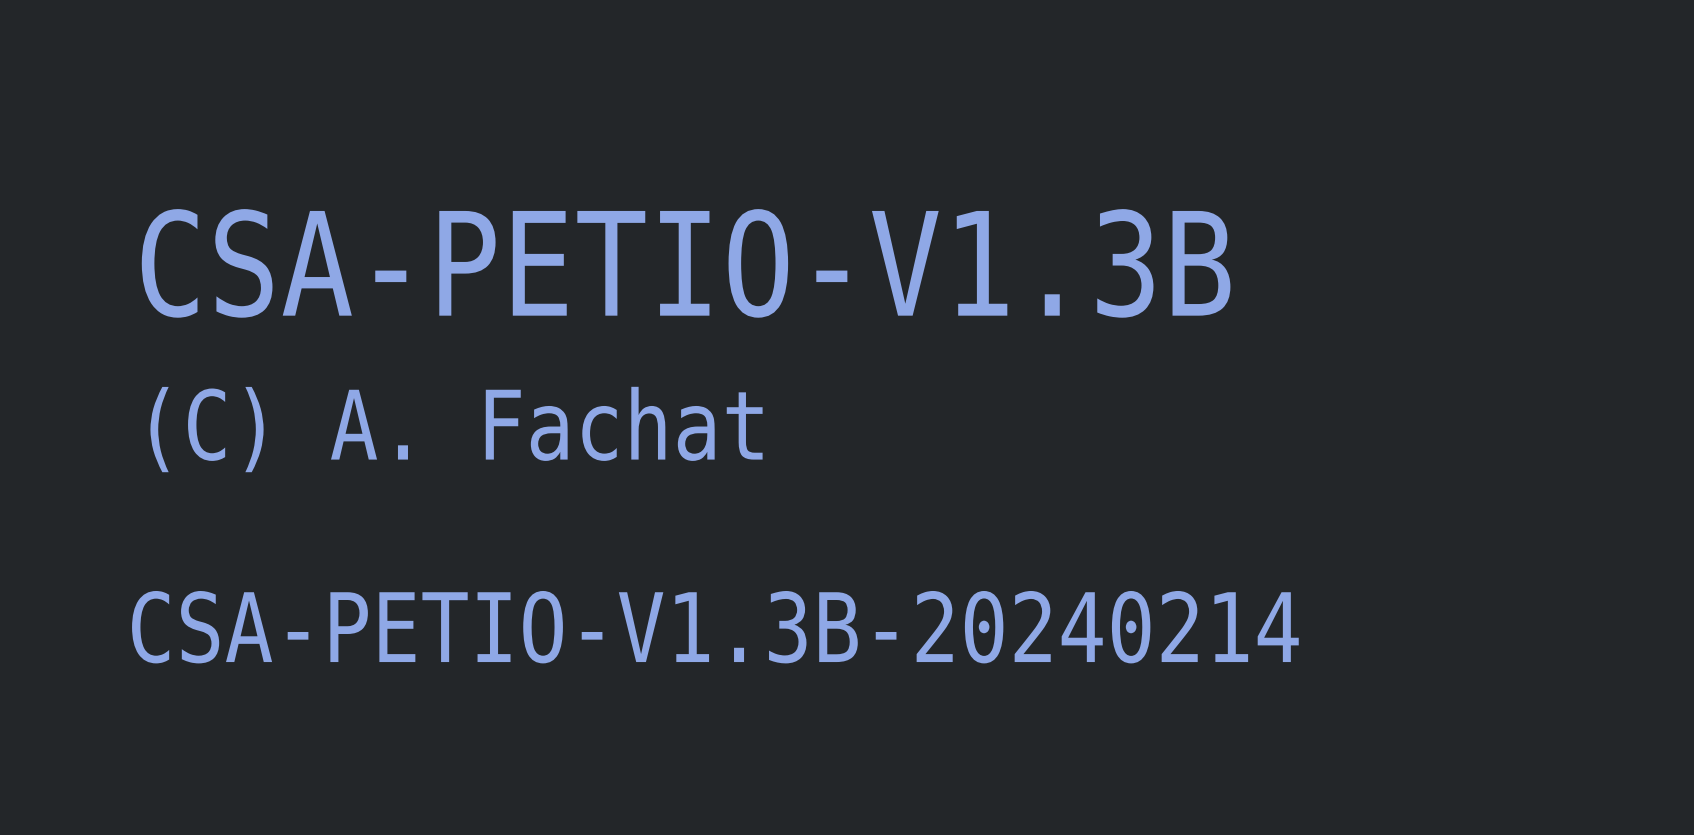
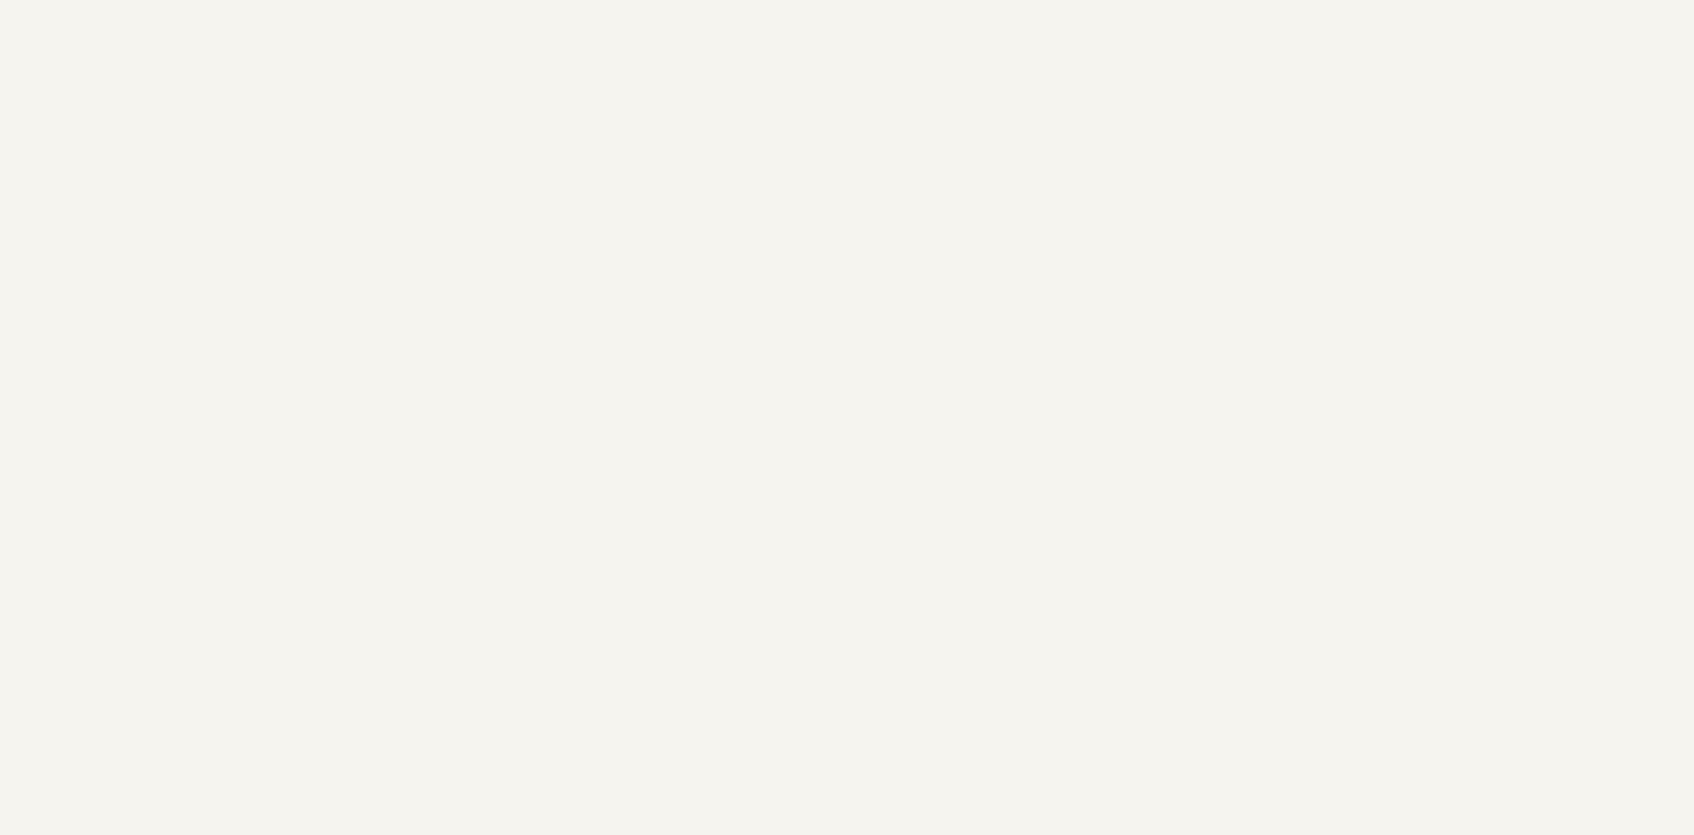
text: CSA-PETIO-V1.3B (686, 263) -> none
text: (C) A. Fachat (456, 429) -> none
text: CSA-PETIO-V1.3B-20240214 (715, 627) -> none

